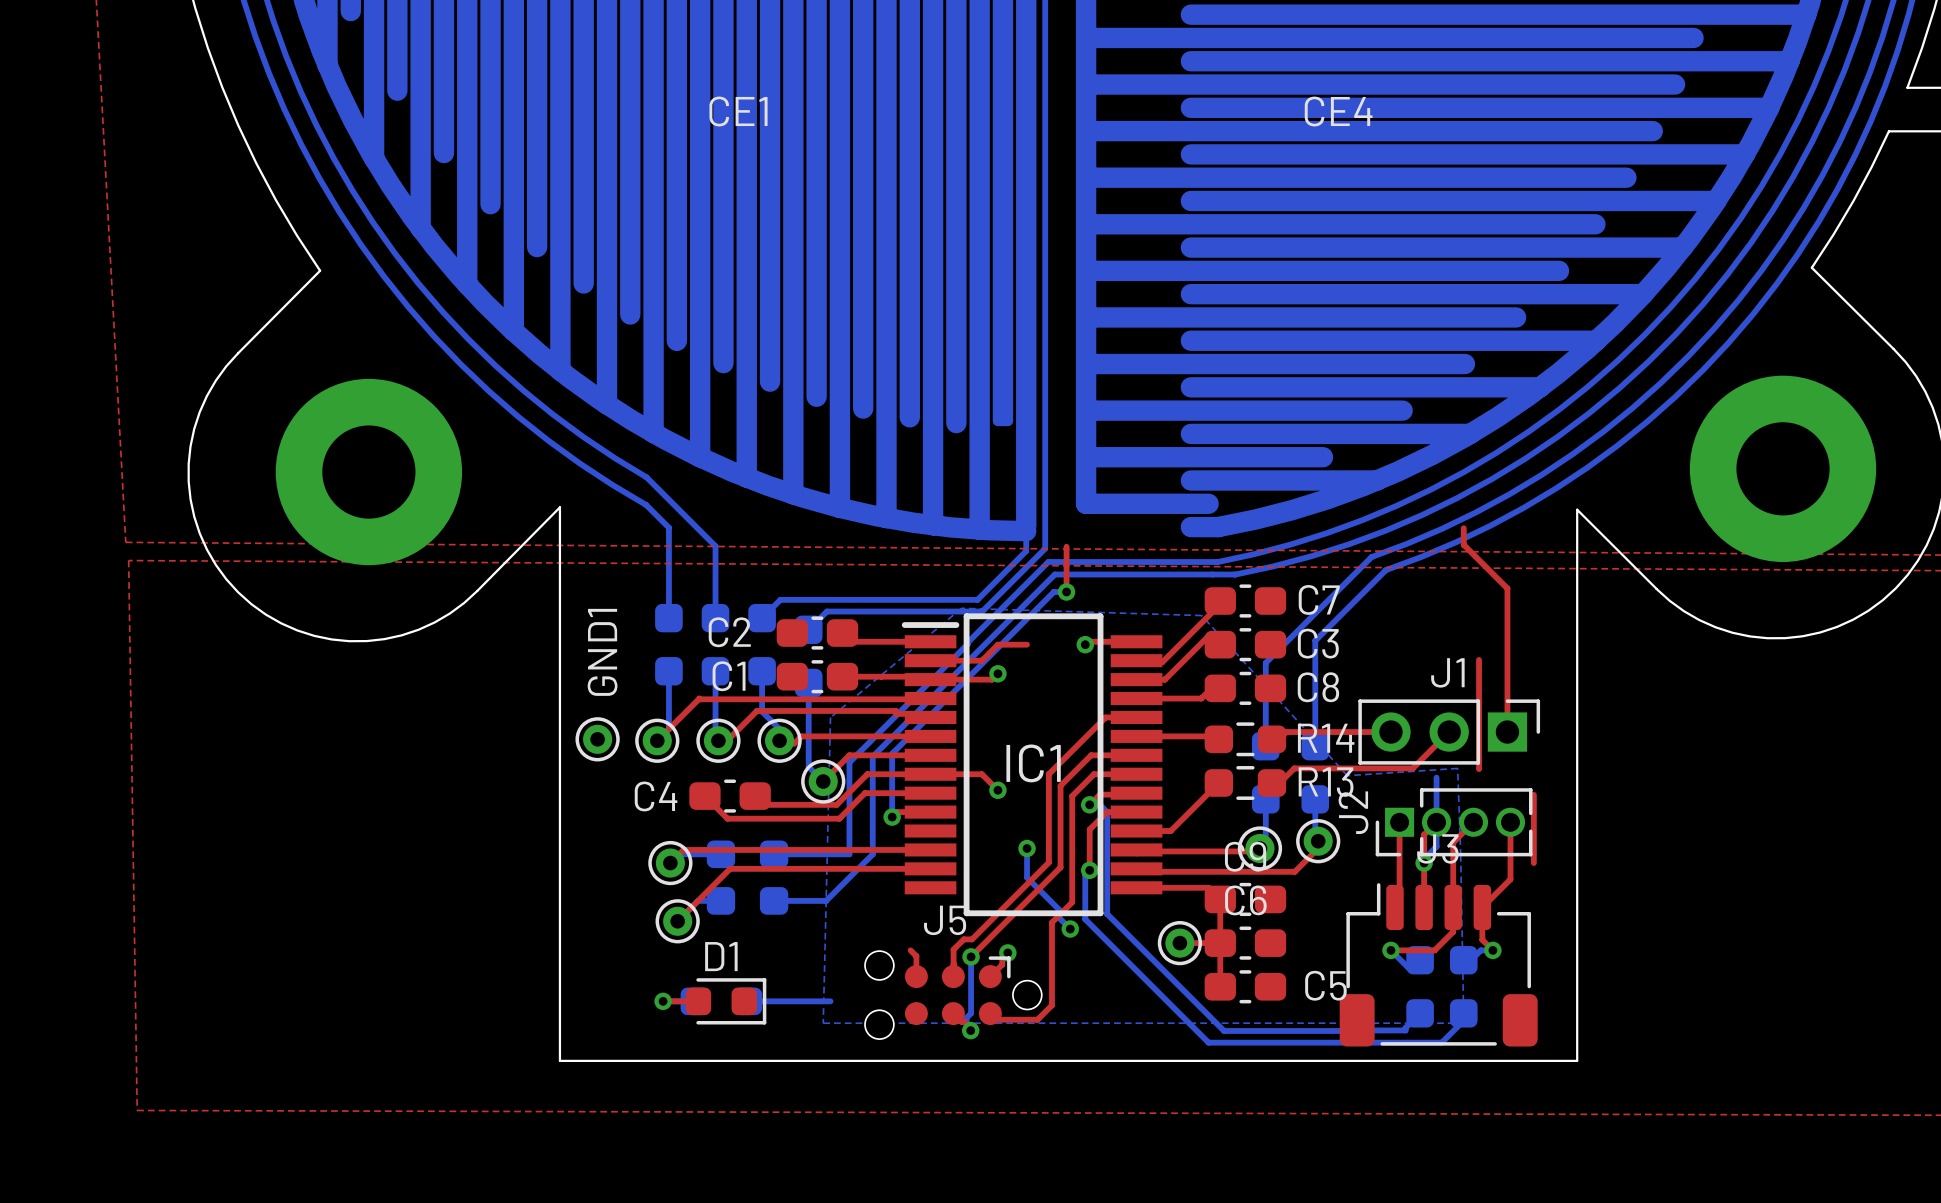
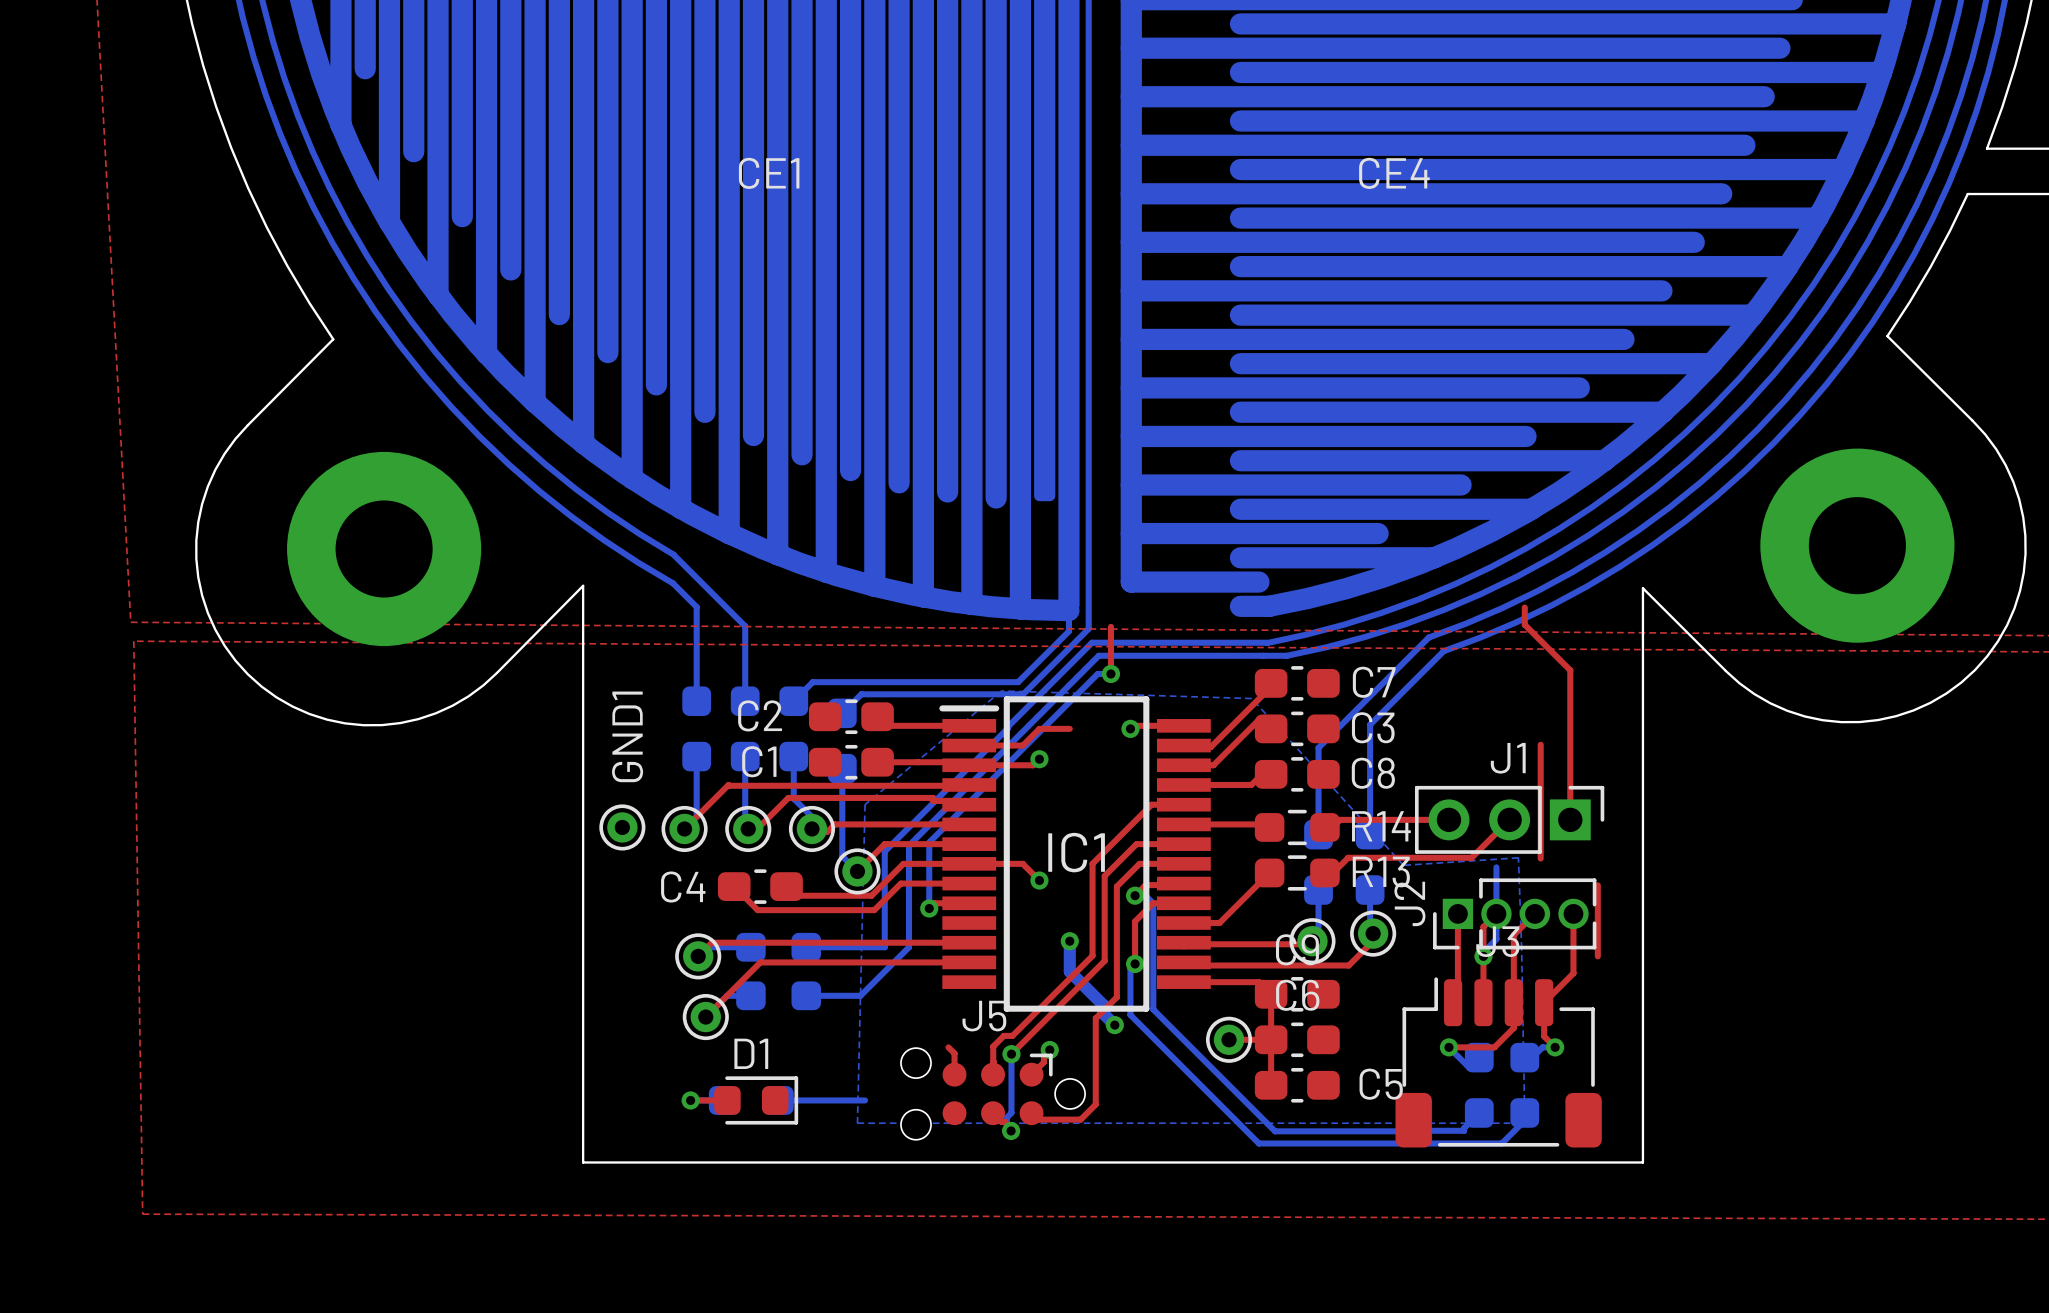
bottom track width: thin (1027, 848) (1027, 877) (1059, 909) (1059, 918) (1070, 929) -> thick (1069, 941) (1069, 971) (1103, 1005) (1103, 1013) (1114, 1025)

